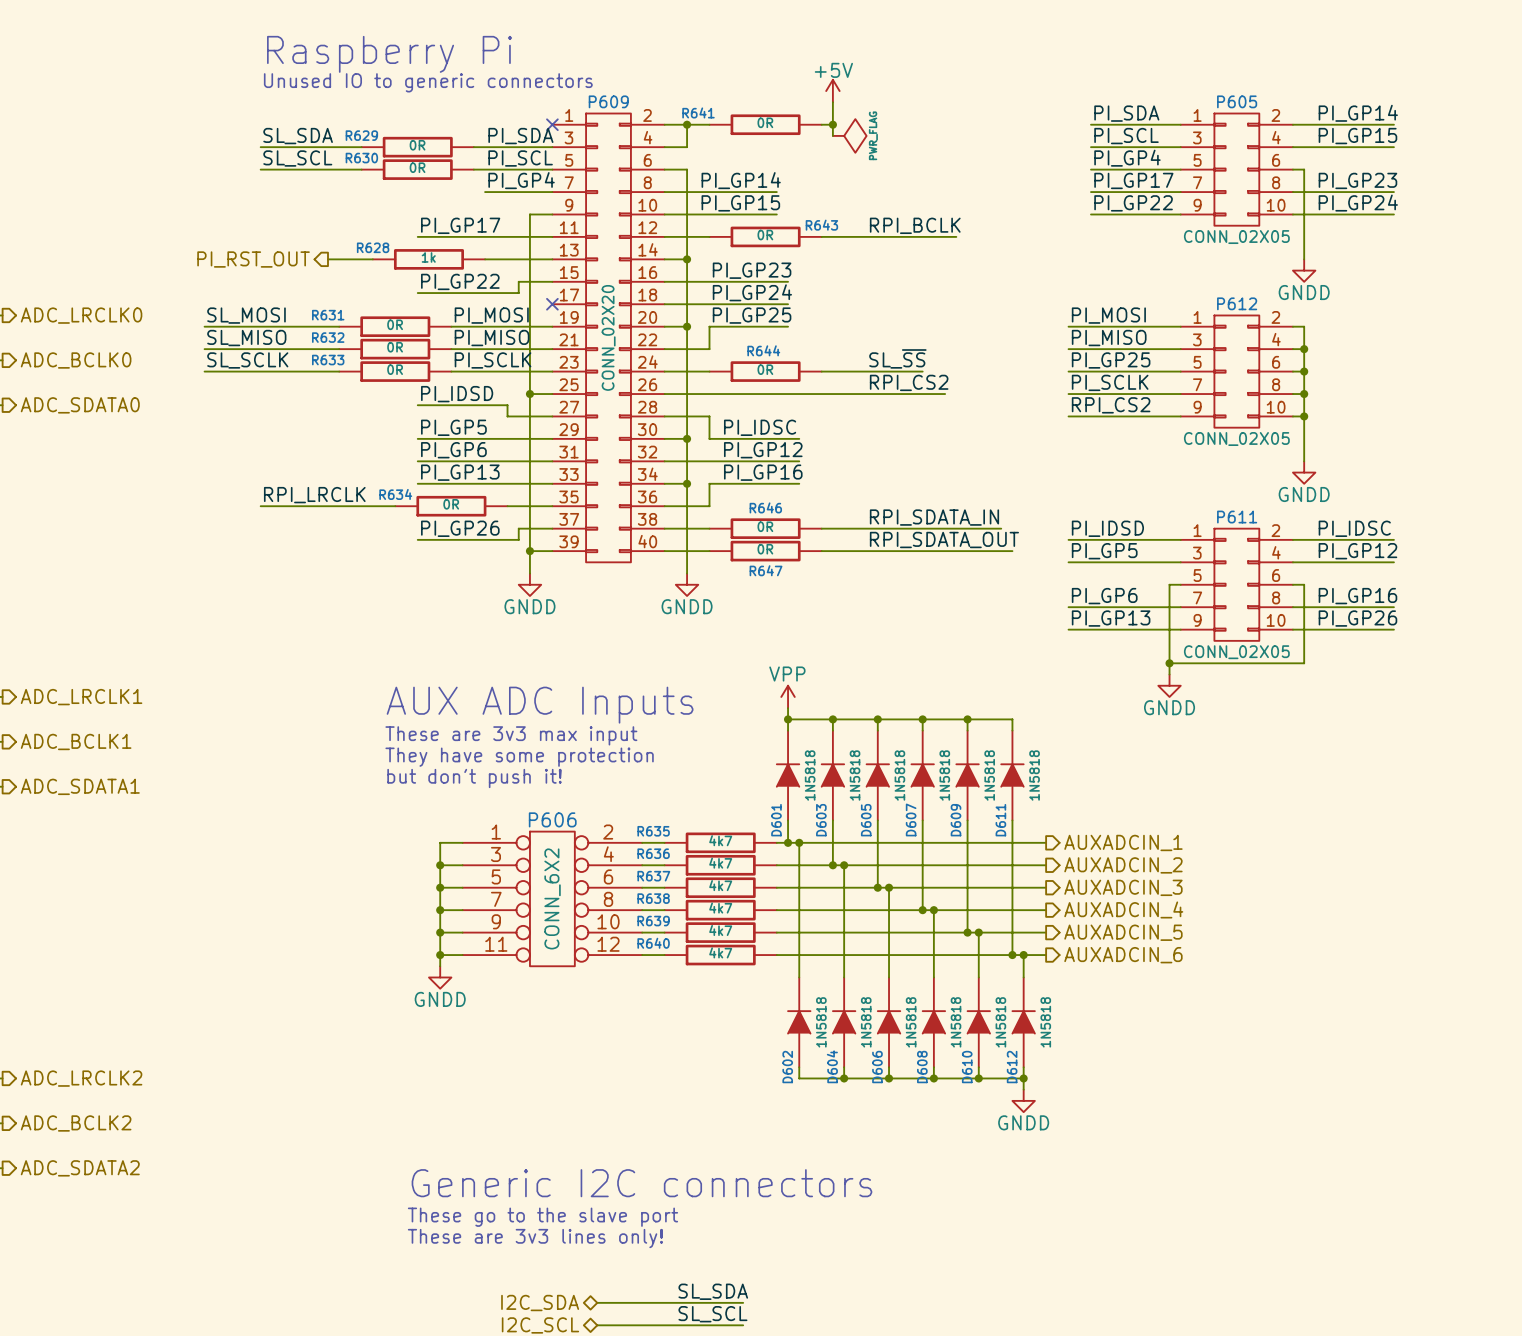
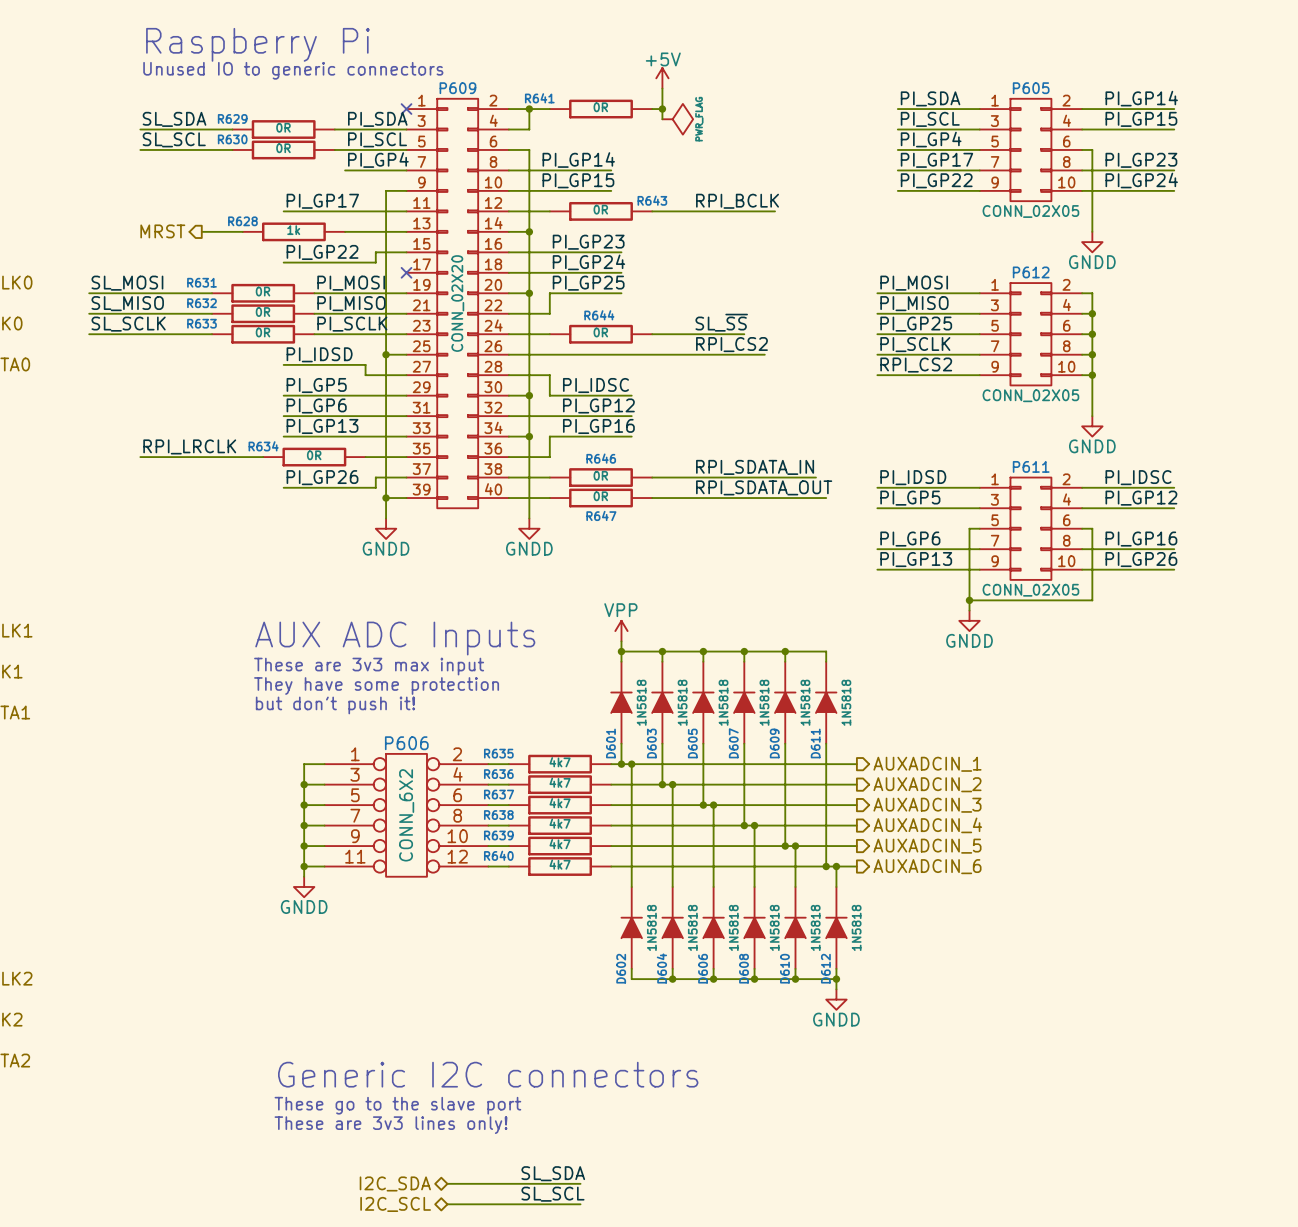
hierarchical label: PI_RST_OUT (253, 259) -> MRST (162, 231)

